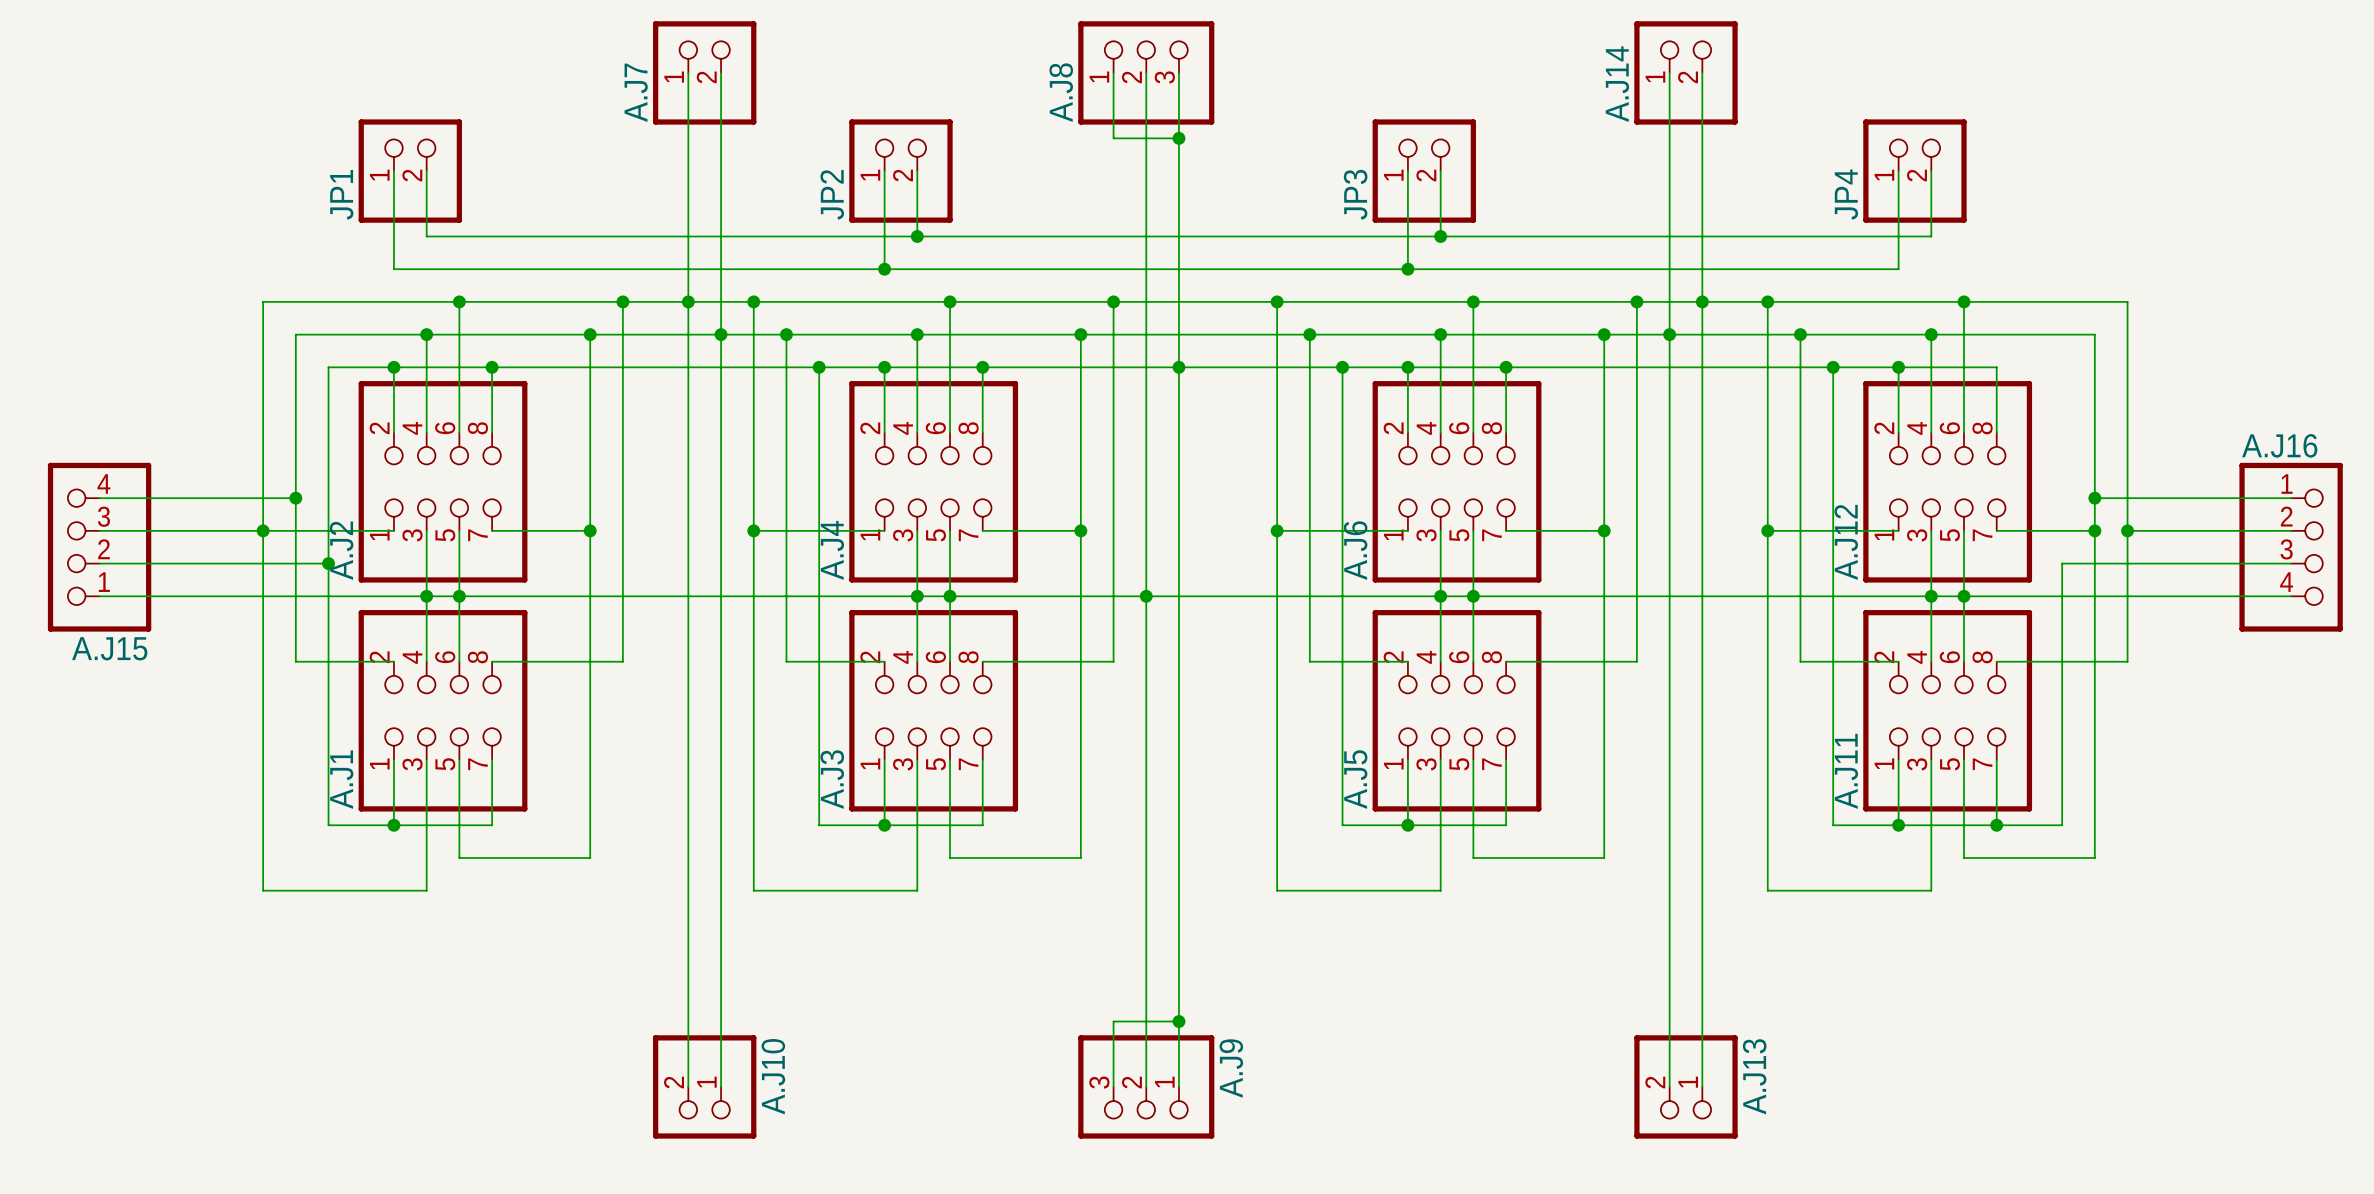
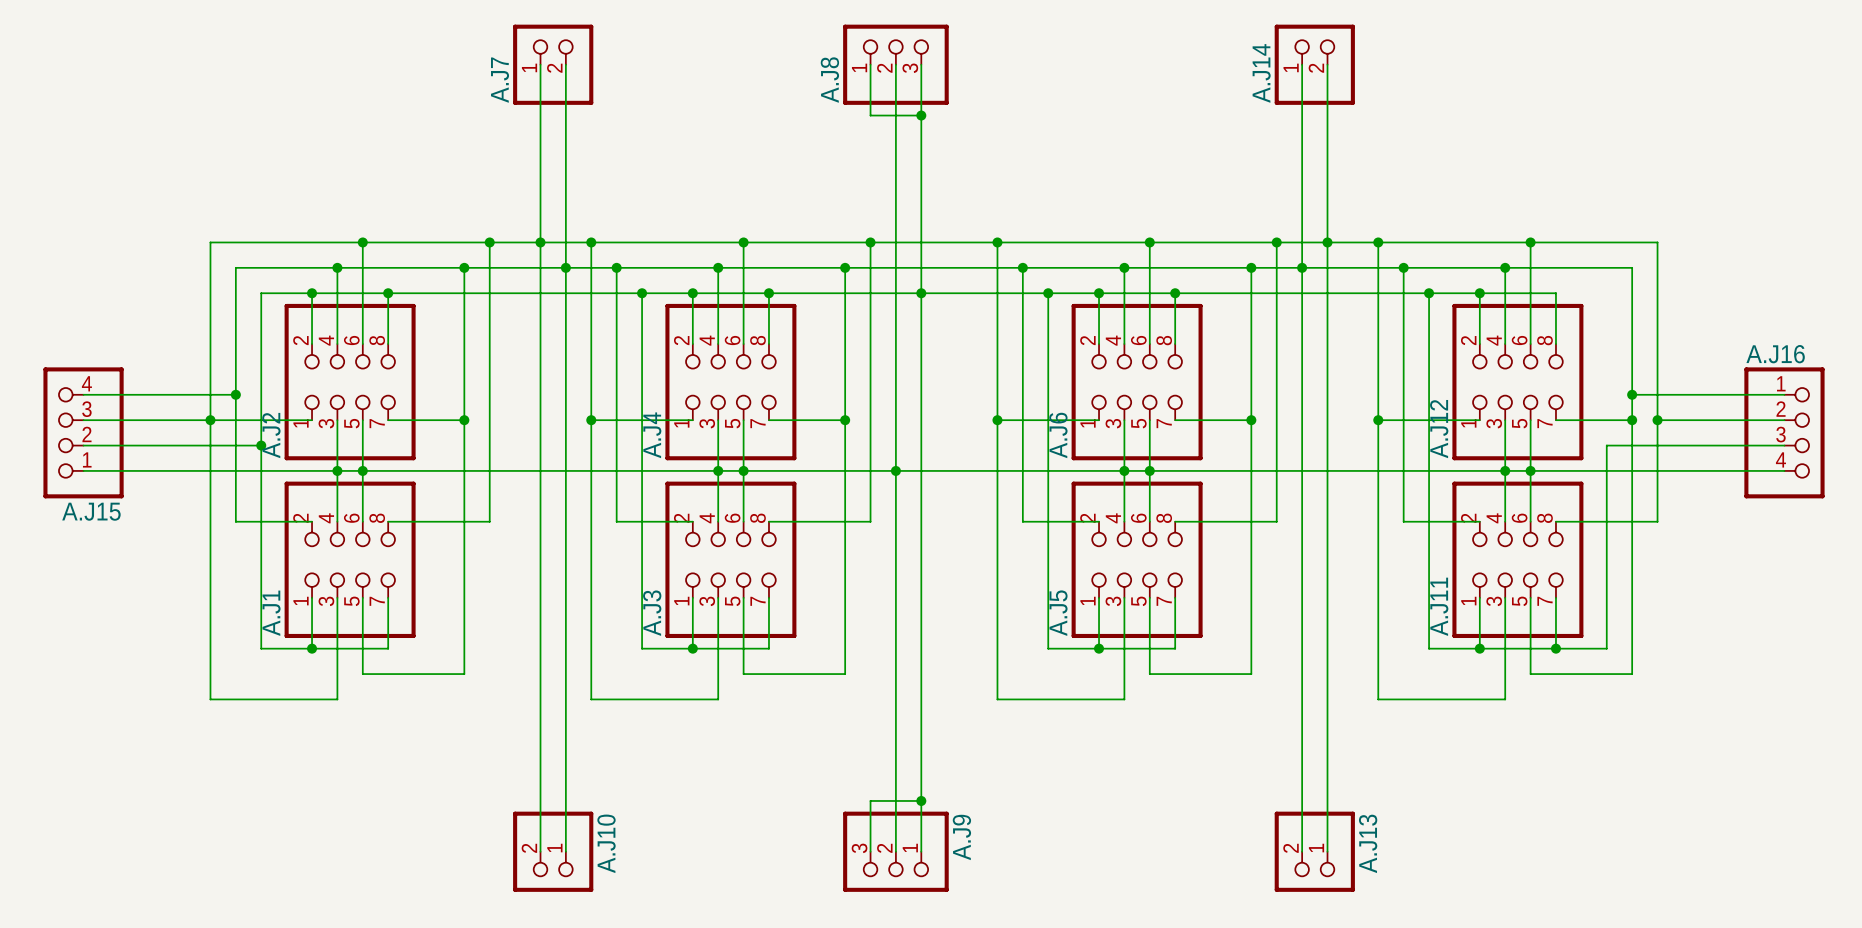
wire: (393, 171) (393, 269) (1898, 269) (1898, 171) -> none
JP1: (410, 171) -> none
wire: (426, 171) (426, 236) (1931, 236) (1931, 171) -> none
wire: (884, 171) (884, 269) -> none
JP2: (900, 171) -> none
wire: (917, 171) (917, 236) -> none
wire: (1407, 171) (1407, 269) -> none
JP3: (1424, 171) -> none
wire: (1440, 171) (1440, 236) -> none
JP4: (1914, 171) -> none
junction: (917, 236) -> none
junction: (1440, 236) -> none
junction: (884, 269) -> none
junction: (1407, 269) -> none

